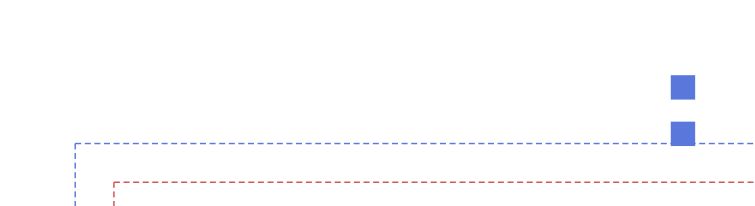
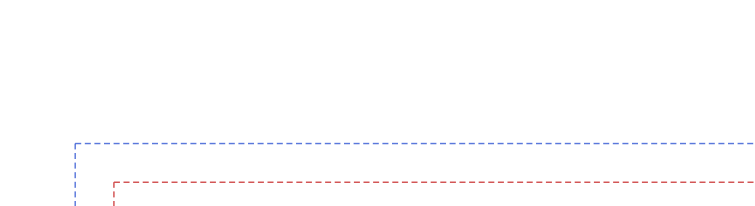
part: (682, 110) -> none

